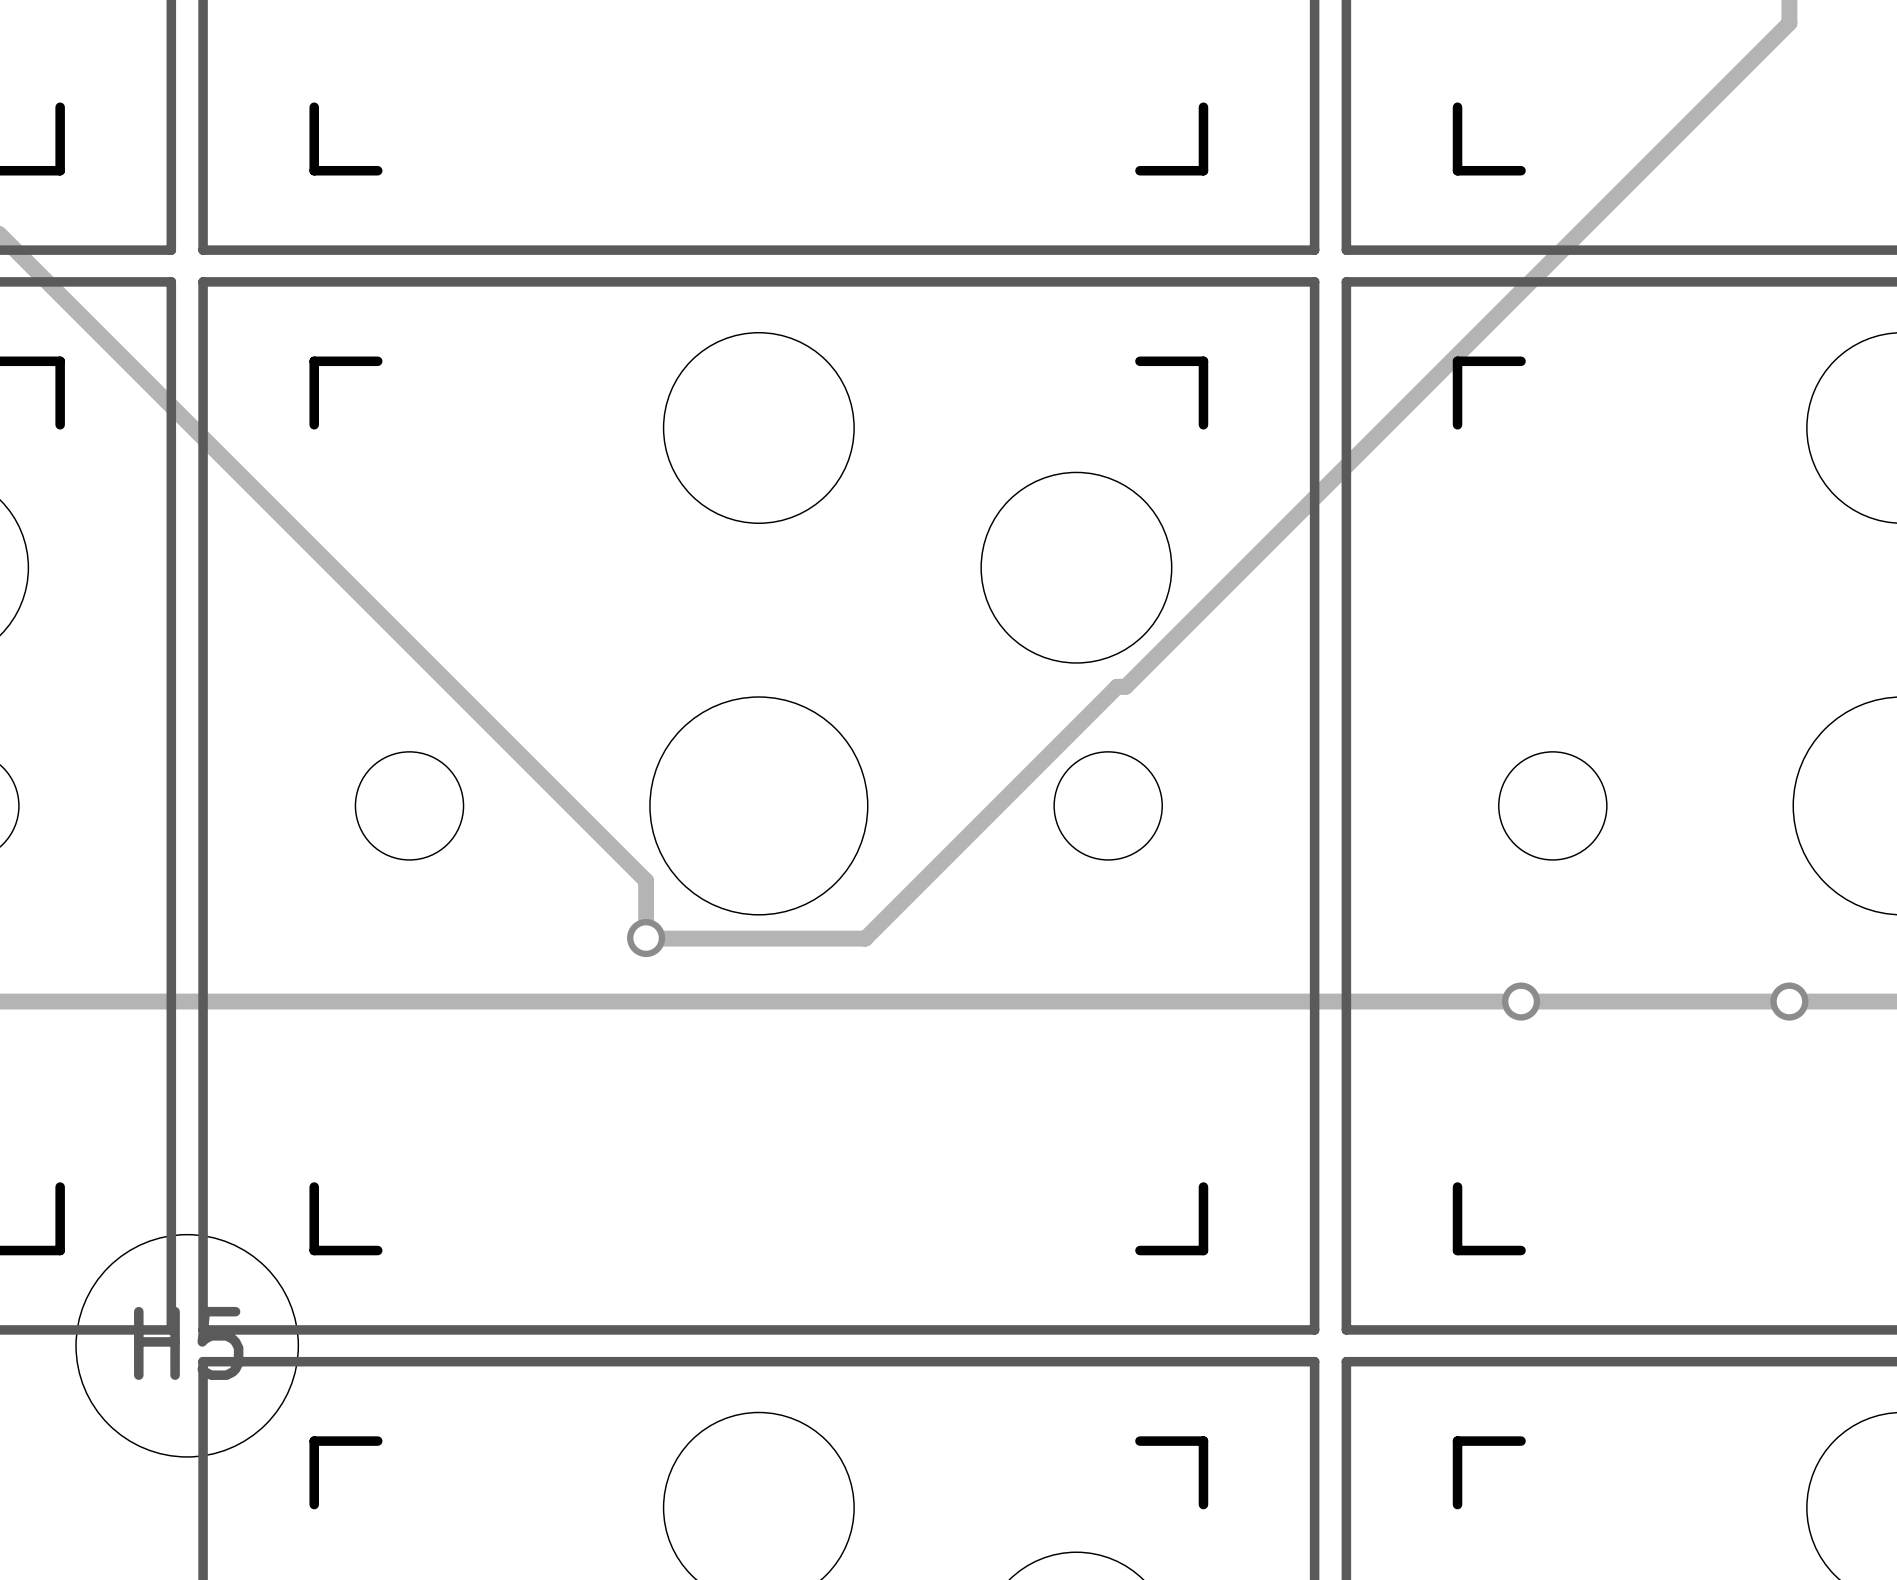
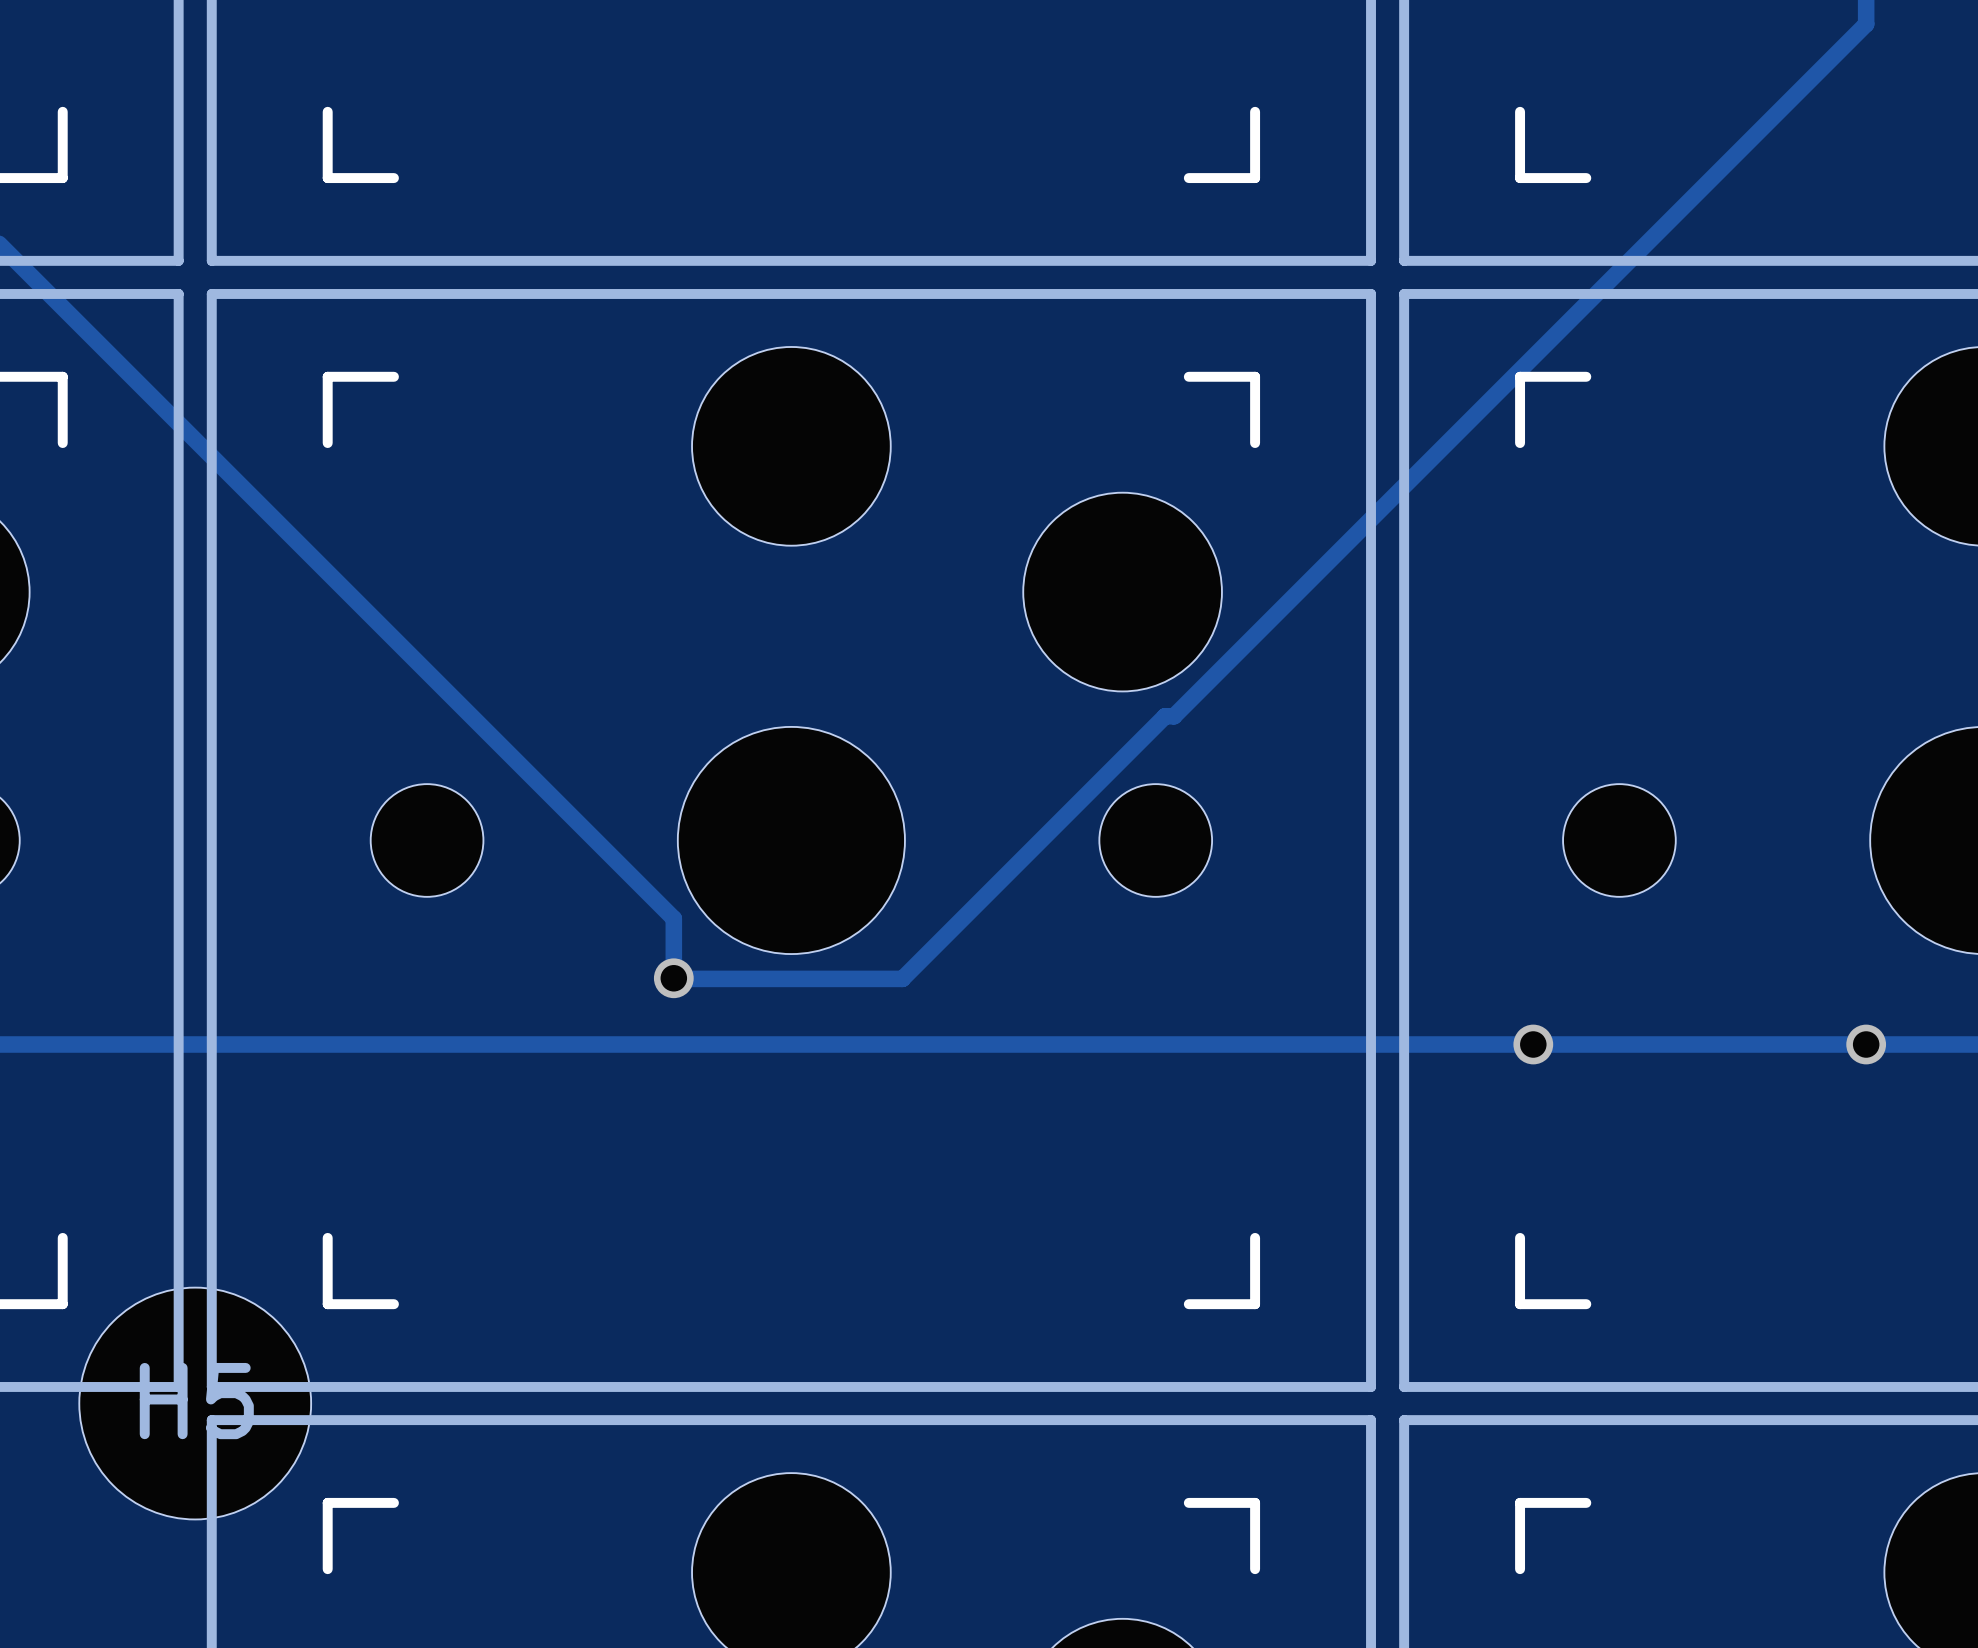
via position: (1521, 1001) -> (1533, 1044)

